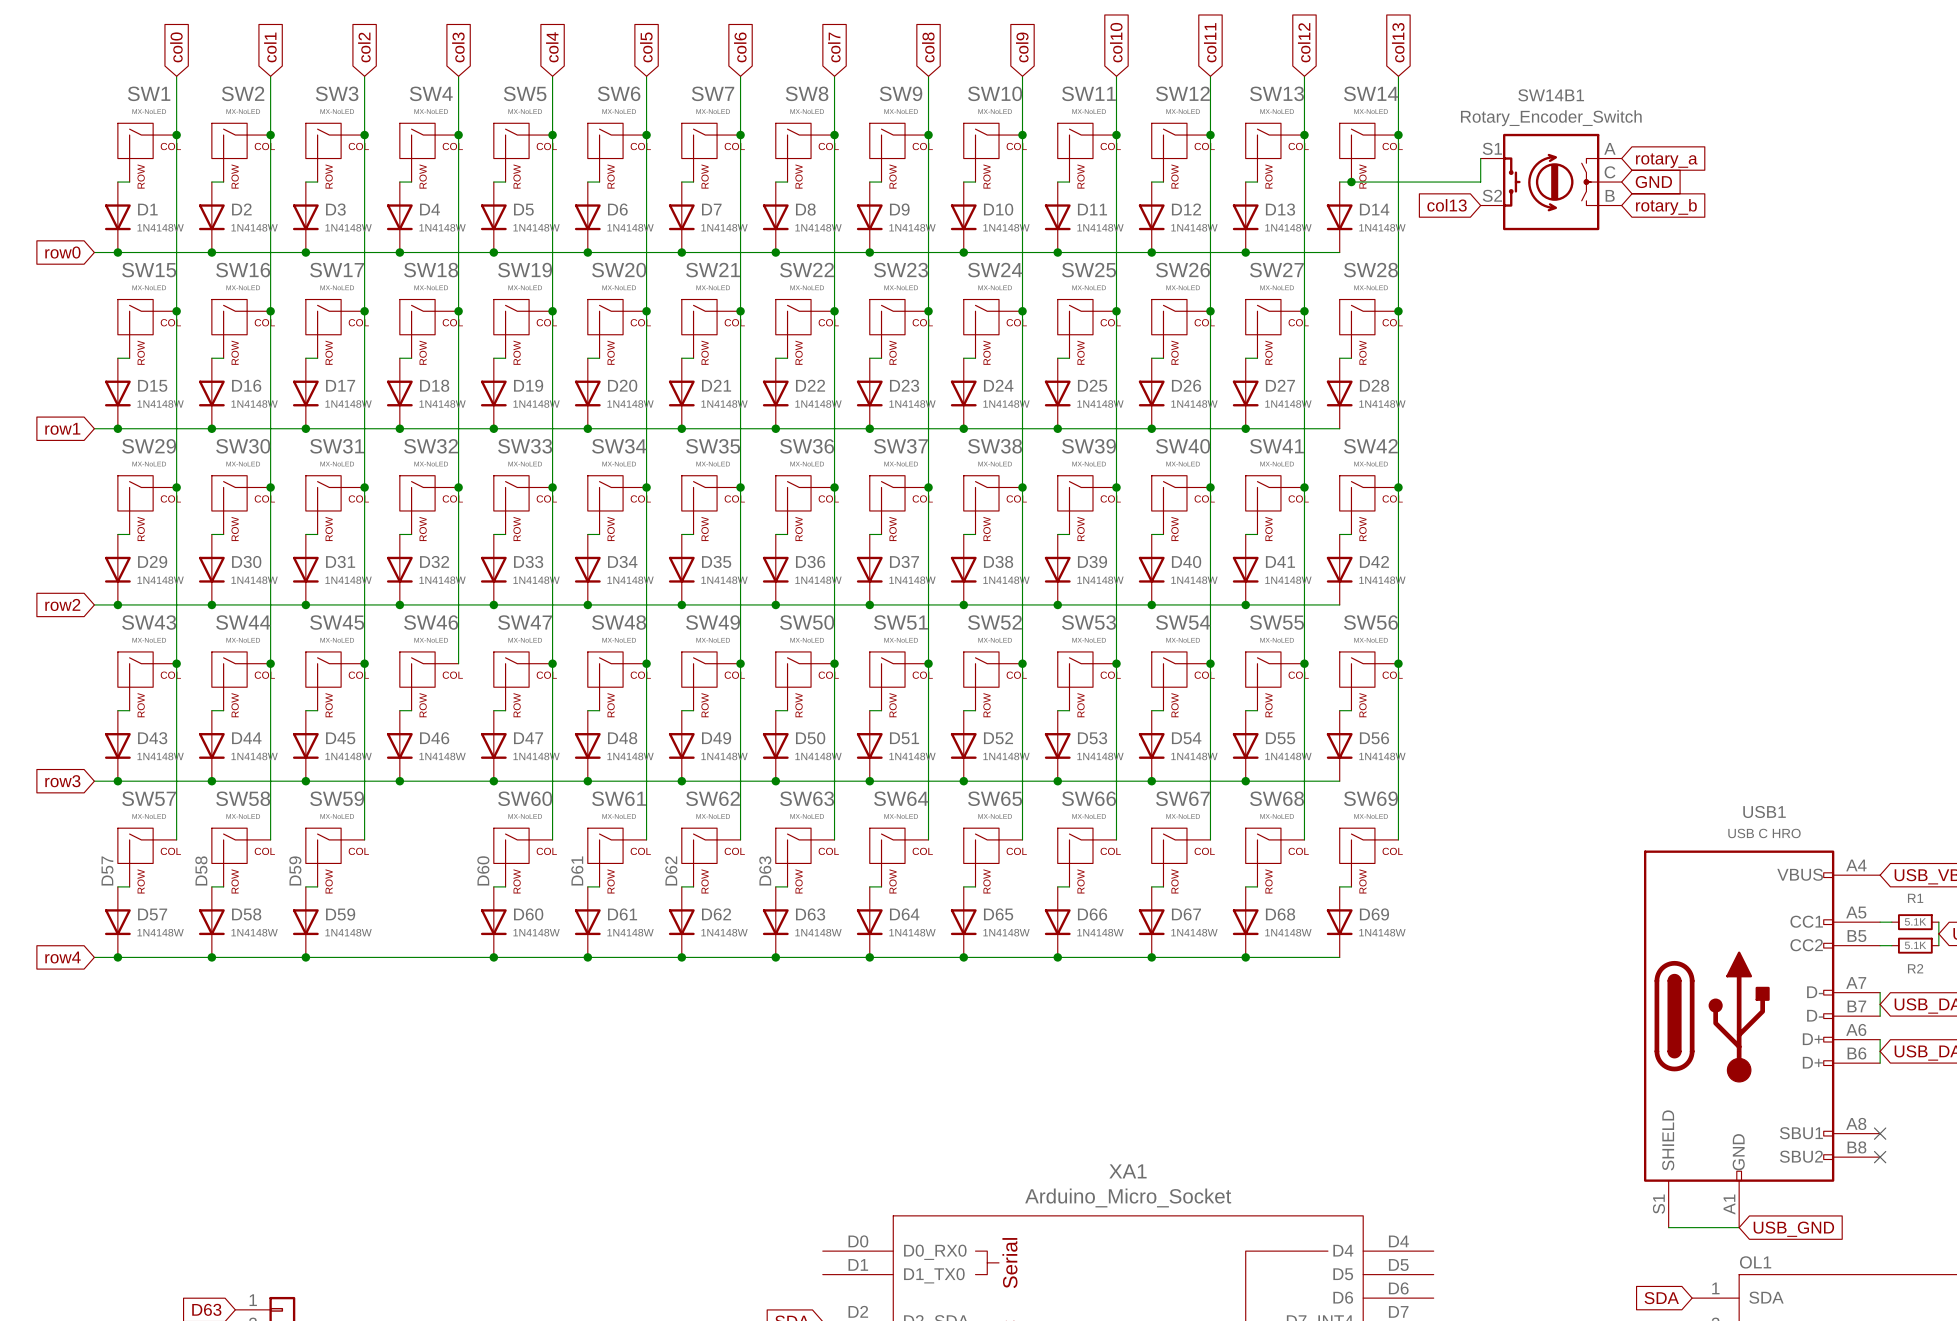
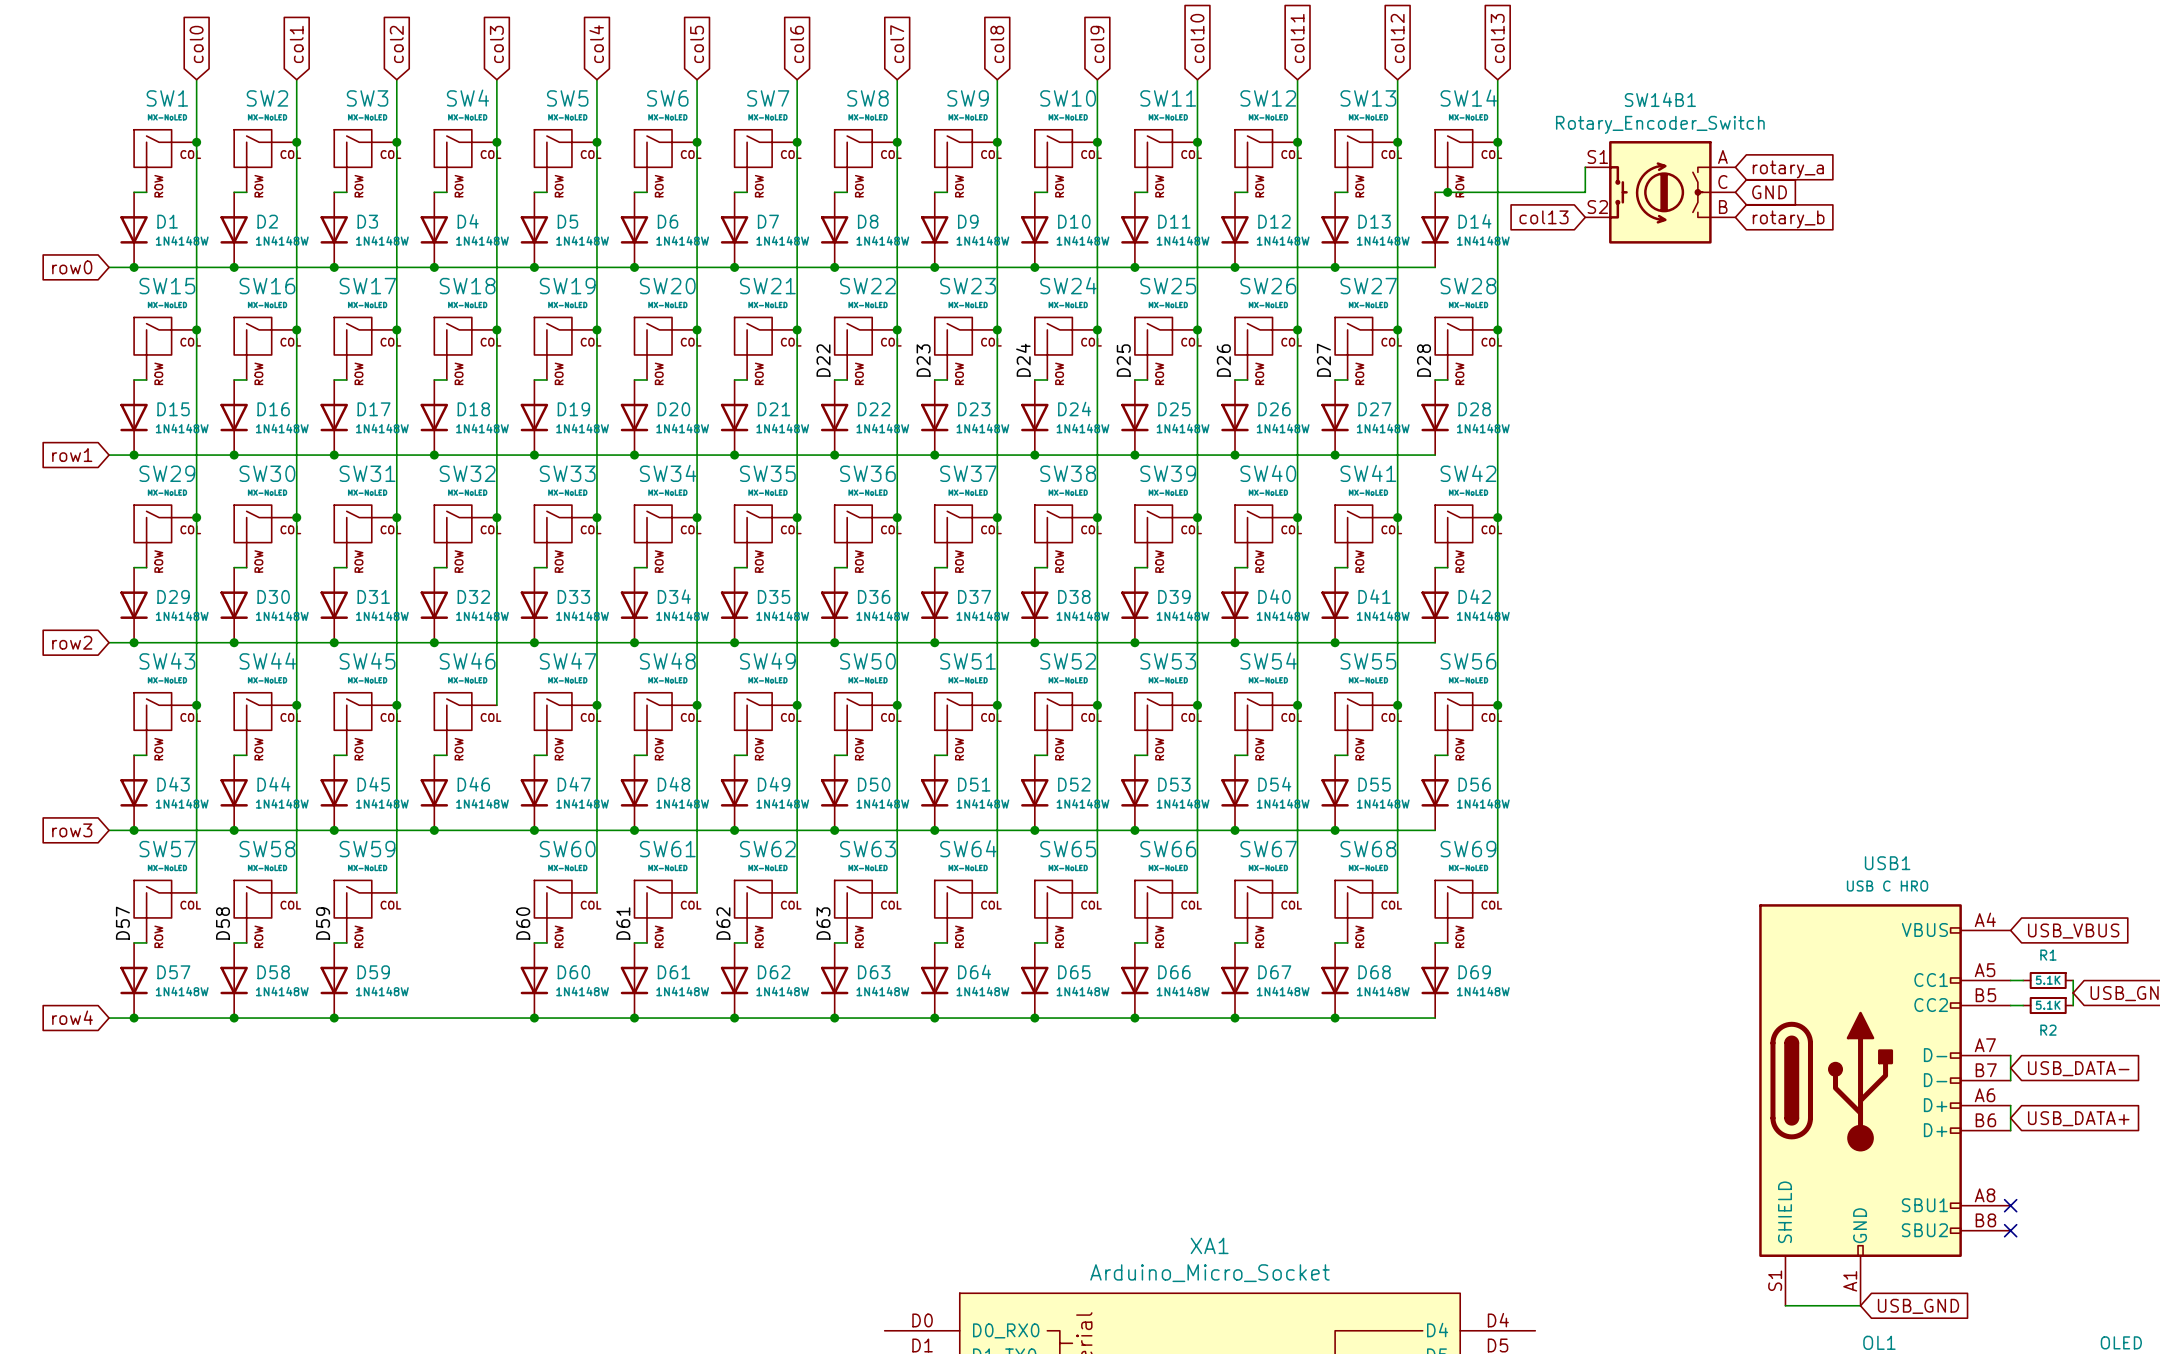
label: none -> D22 (823, 360)
label: none -> D23 (923, 360)
label: none -> D24 (1023, 360)
label: none -> D25 (1123, 360)
label: none -> D26 (1223, 360)
label: none -> D27 (1323, 360)
label: none -> D28 (1424, 360)

